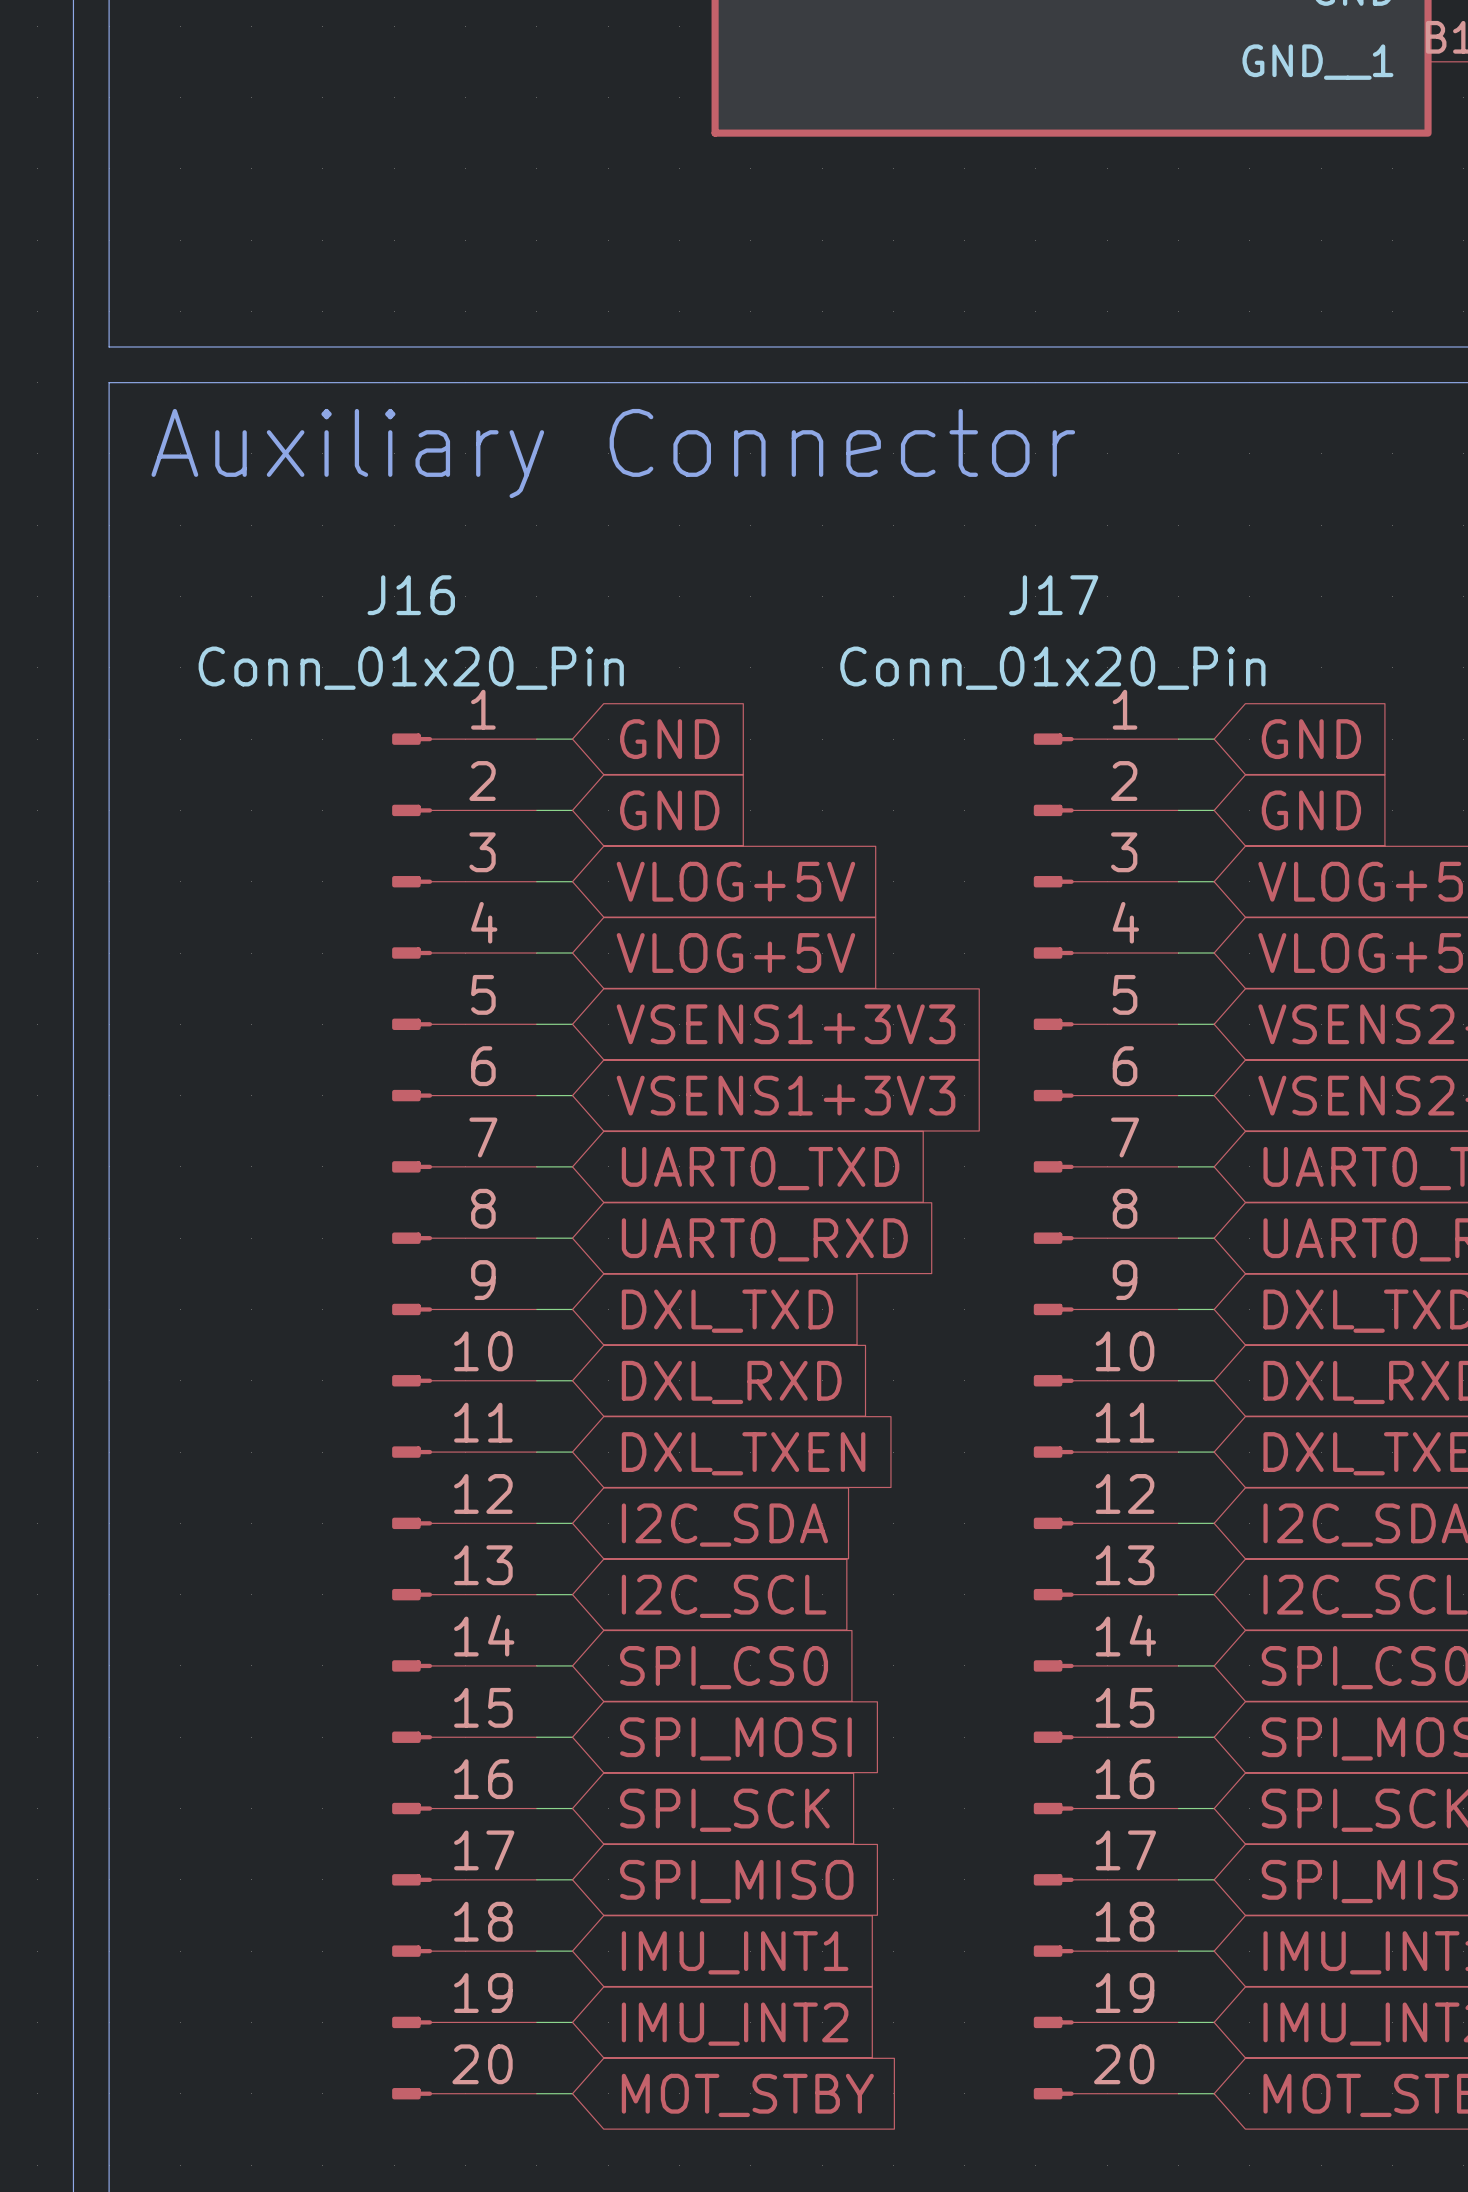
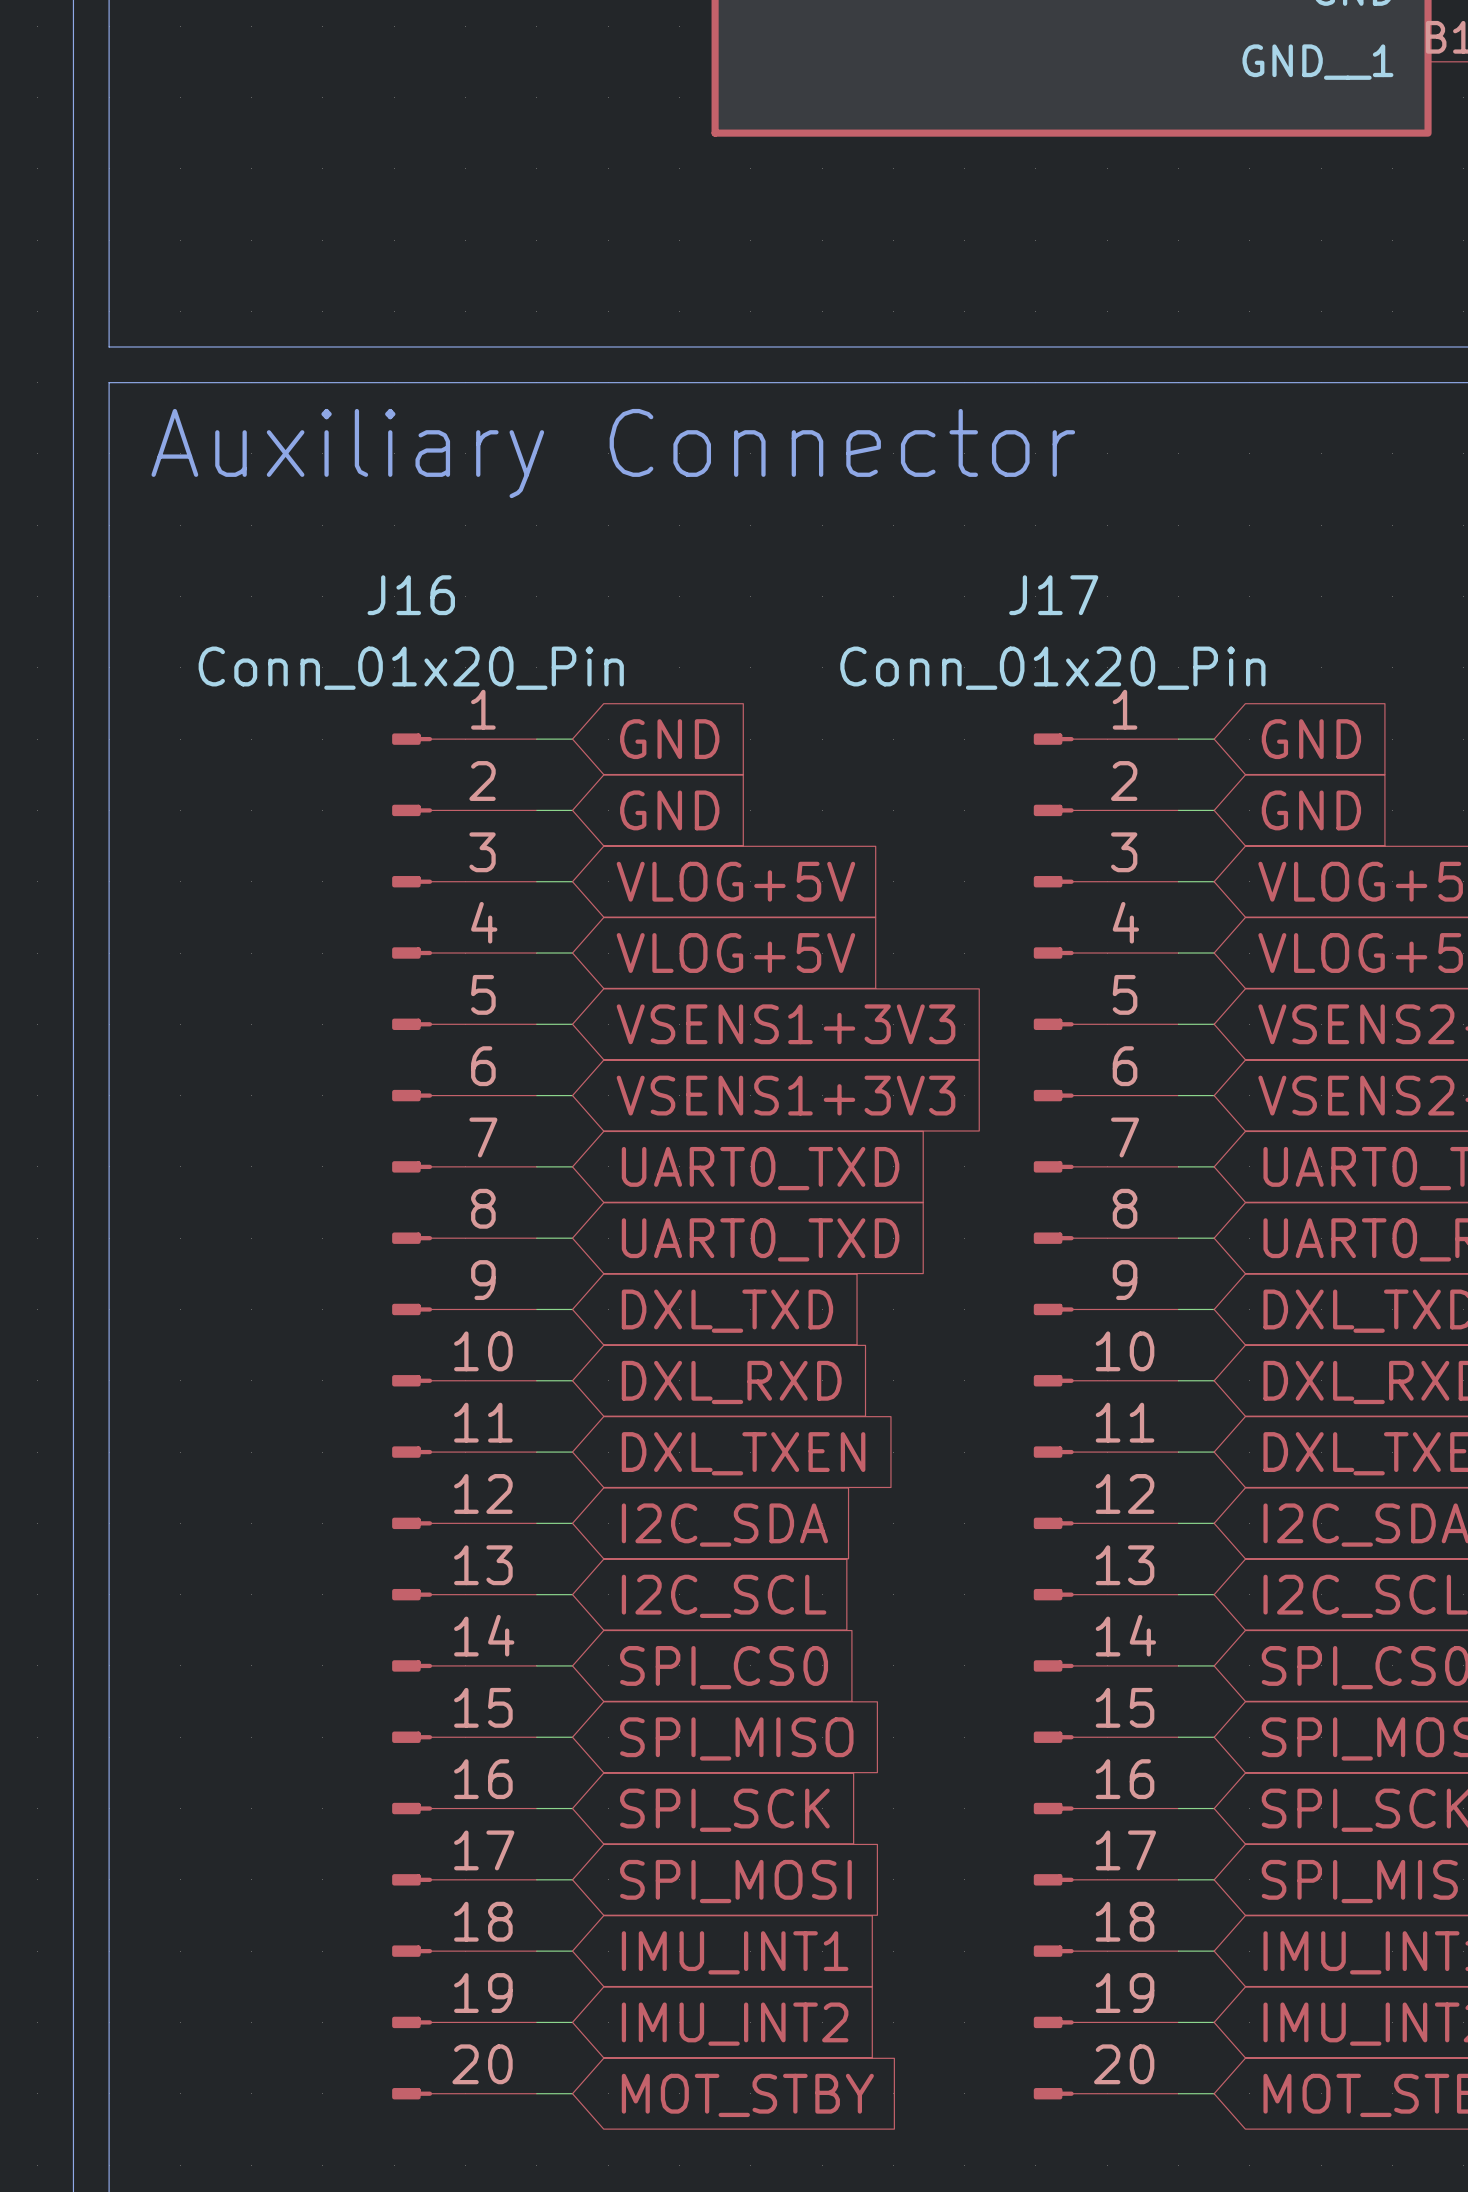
global label: UART0_RXD (764, 1239) -> UART0_TXD (760, 1239)
global label: SPI_MOSI (735, 1738) -> SPI_MISO (736, 1738)
global label: SPI_MISO (736, 1881) -> SPI_MOSI (735, 1881)

